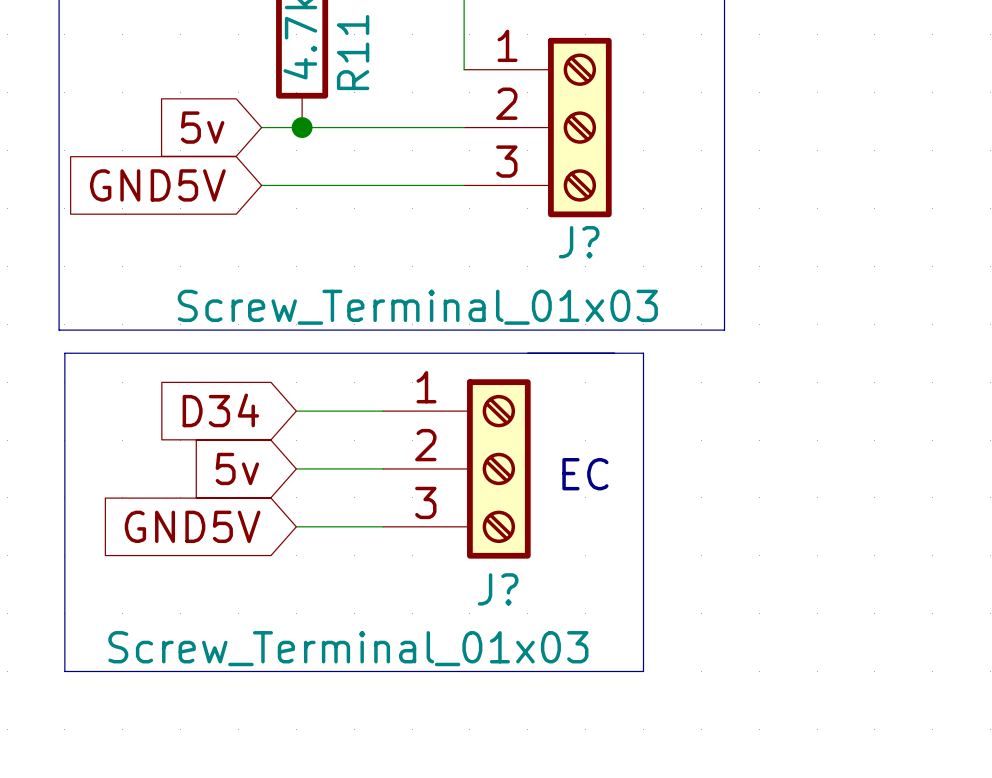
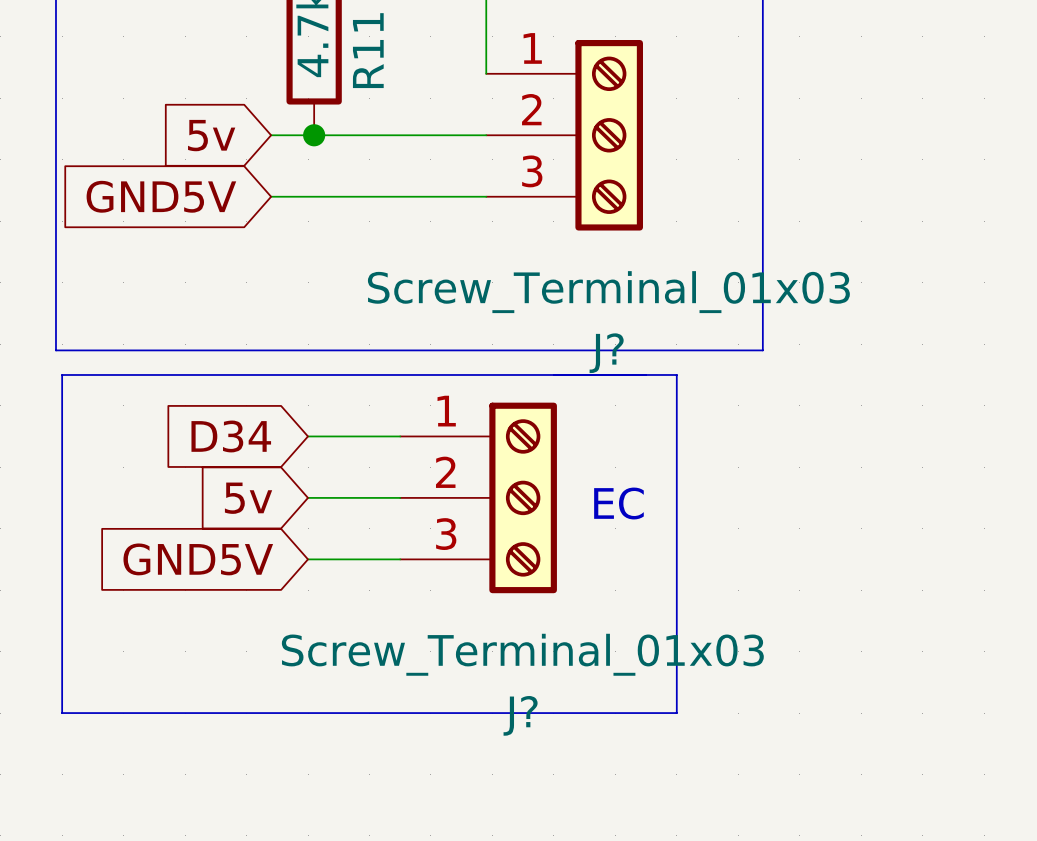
J? name position: J? (579, 242) -> J? (606, 353)
J? value position: Screw_Terminal_01x03 (417, 307) -> Screw_Terminal_01x03 (608, 292)
J? name position: J? (498, 589) -> J? (520, 715)
J? value position: Screw_Terminal_01x03 (348, 648) -> Screw_Terminal_01x03 (522, 654)

